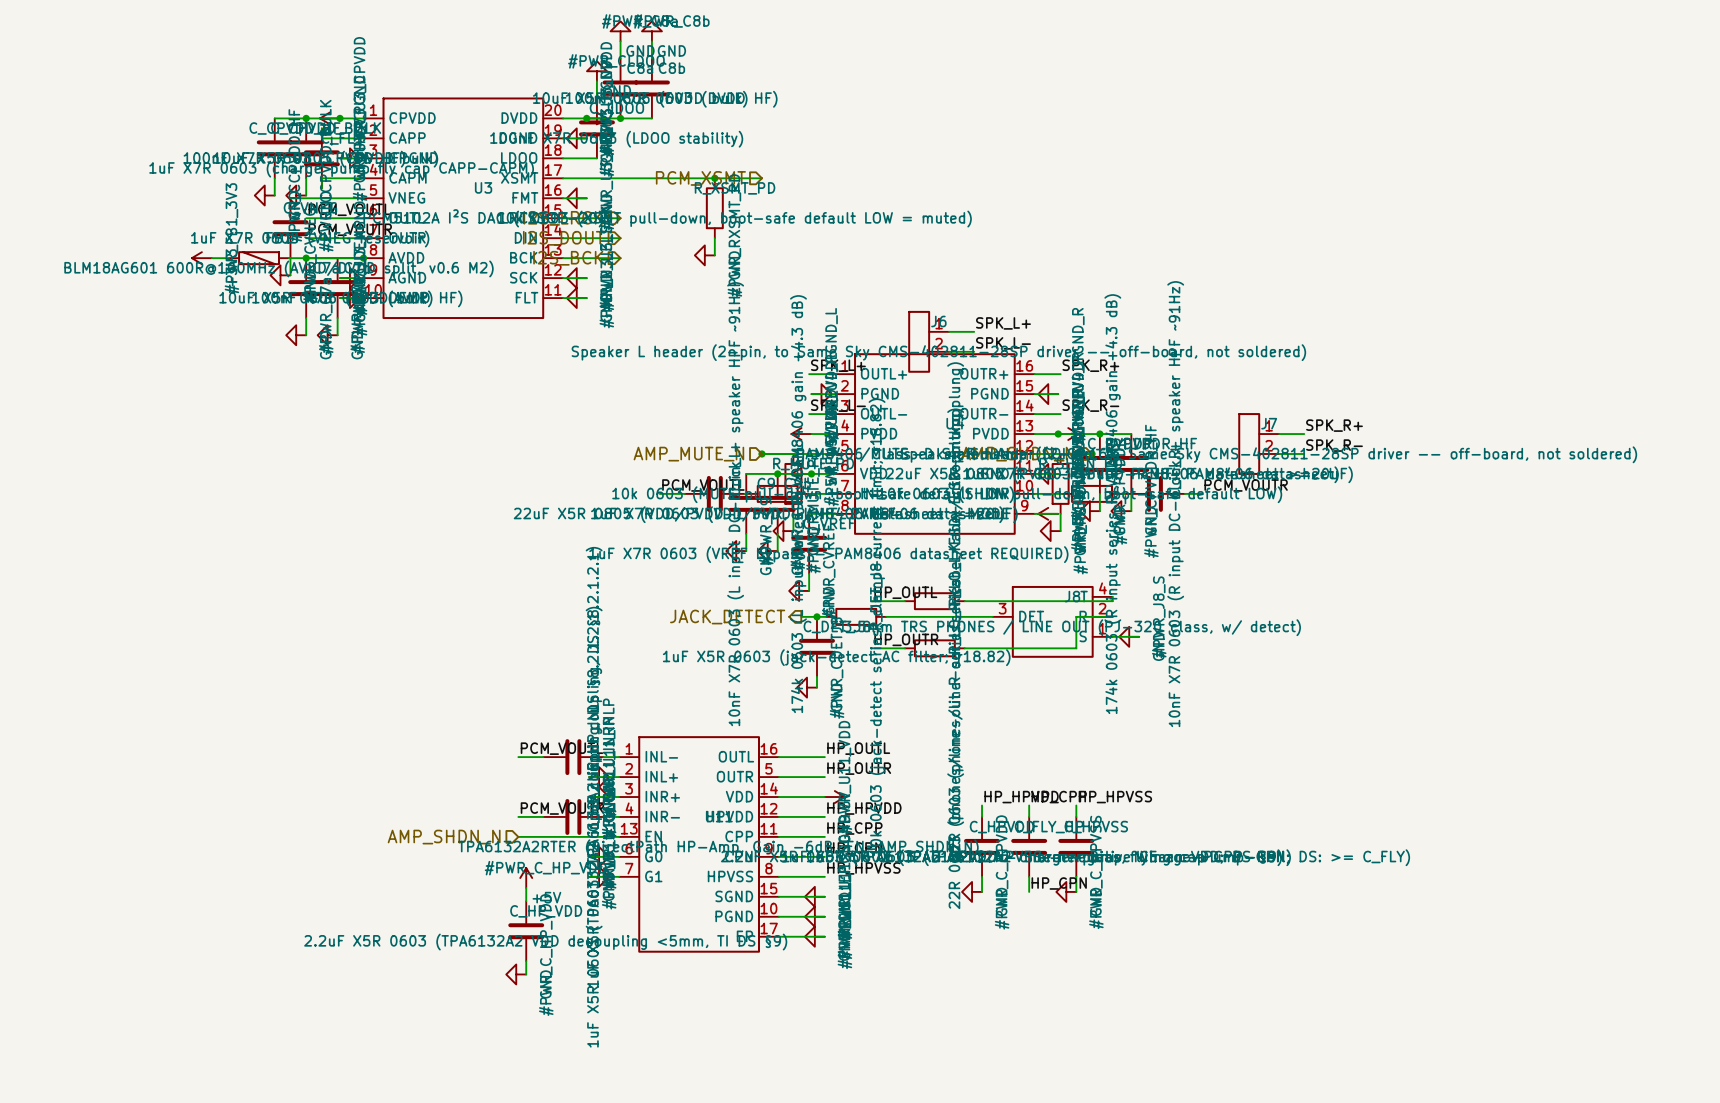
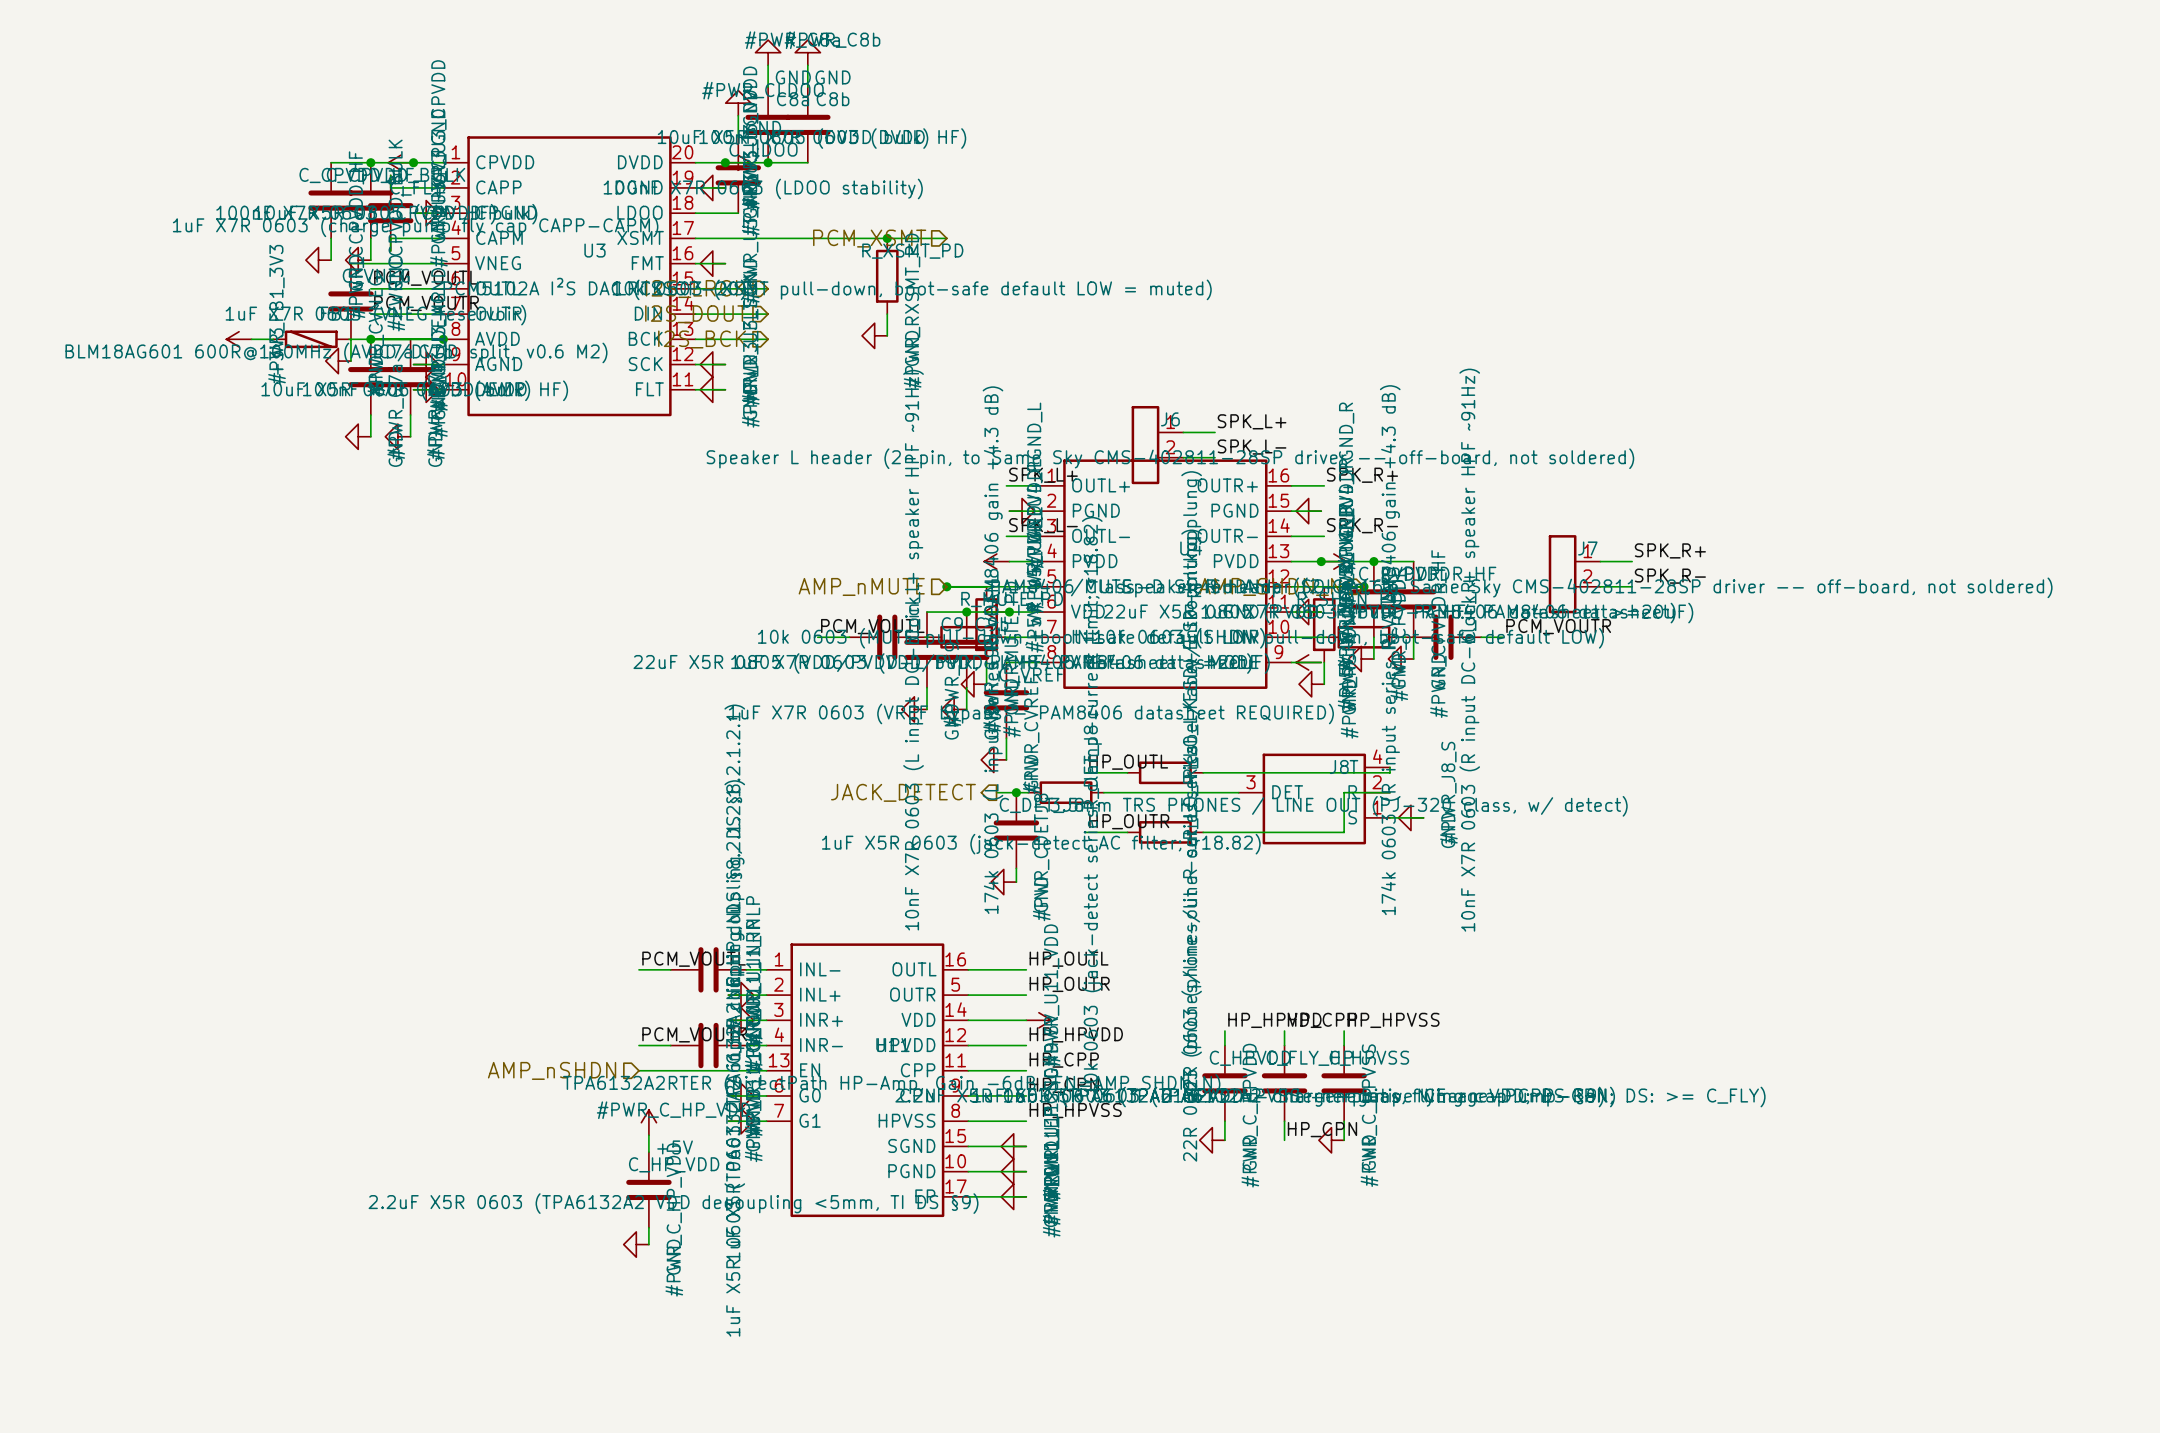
hierarchical label: AMP_MUTE_N (688, 454) -> AMP_nMUTE (861, 586)
hierarchical label: AMP_SHDN_N (444, 837) -> AMP_nSHDN (552, 1070)

